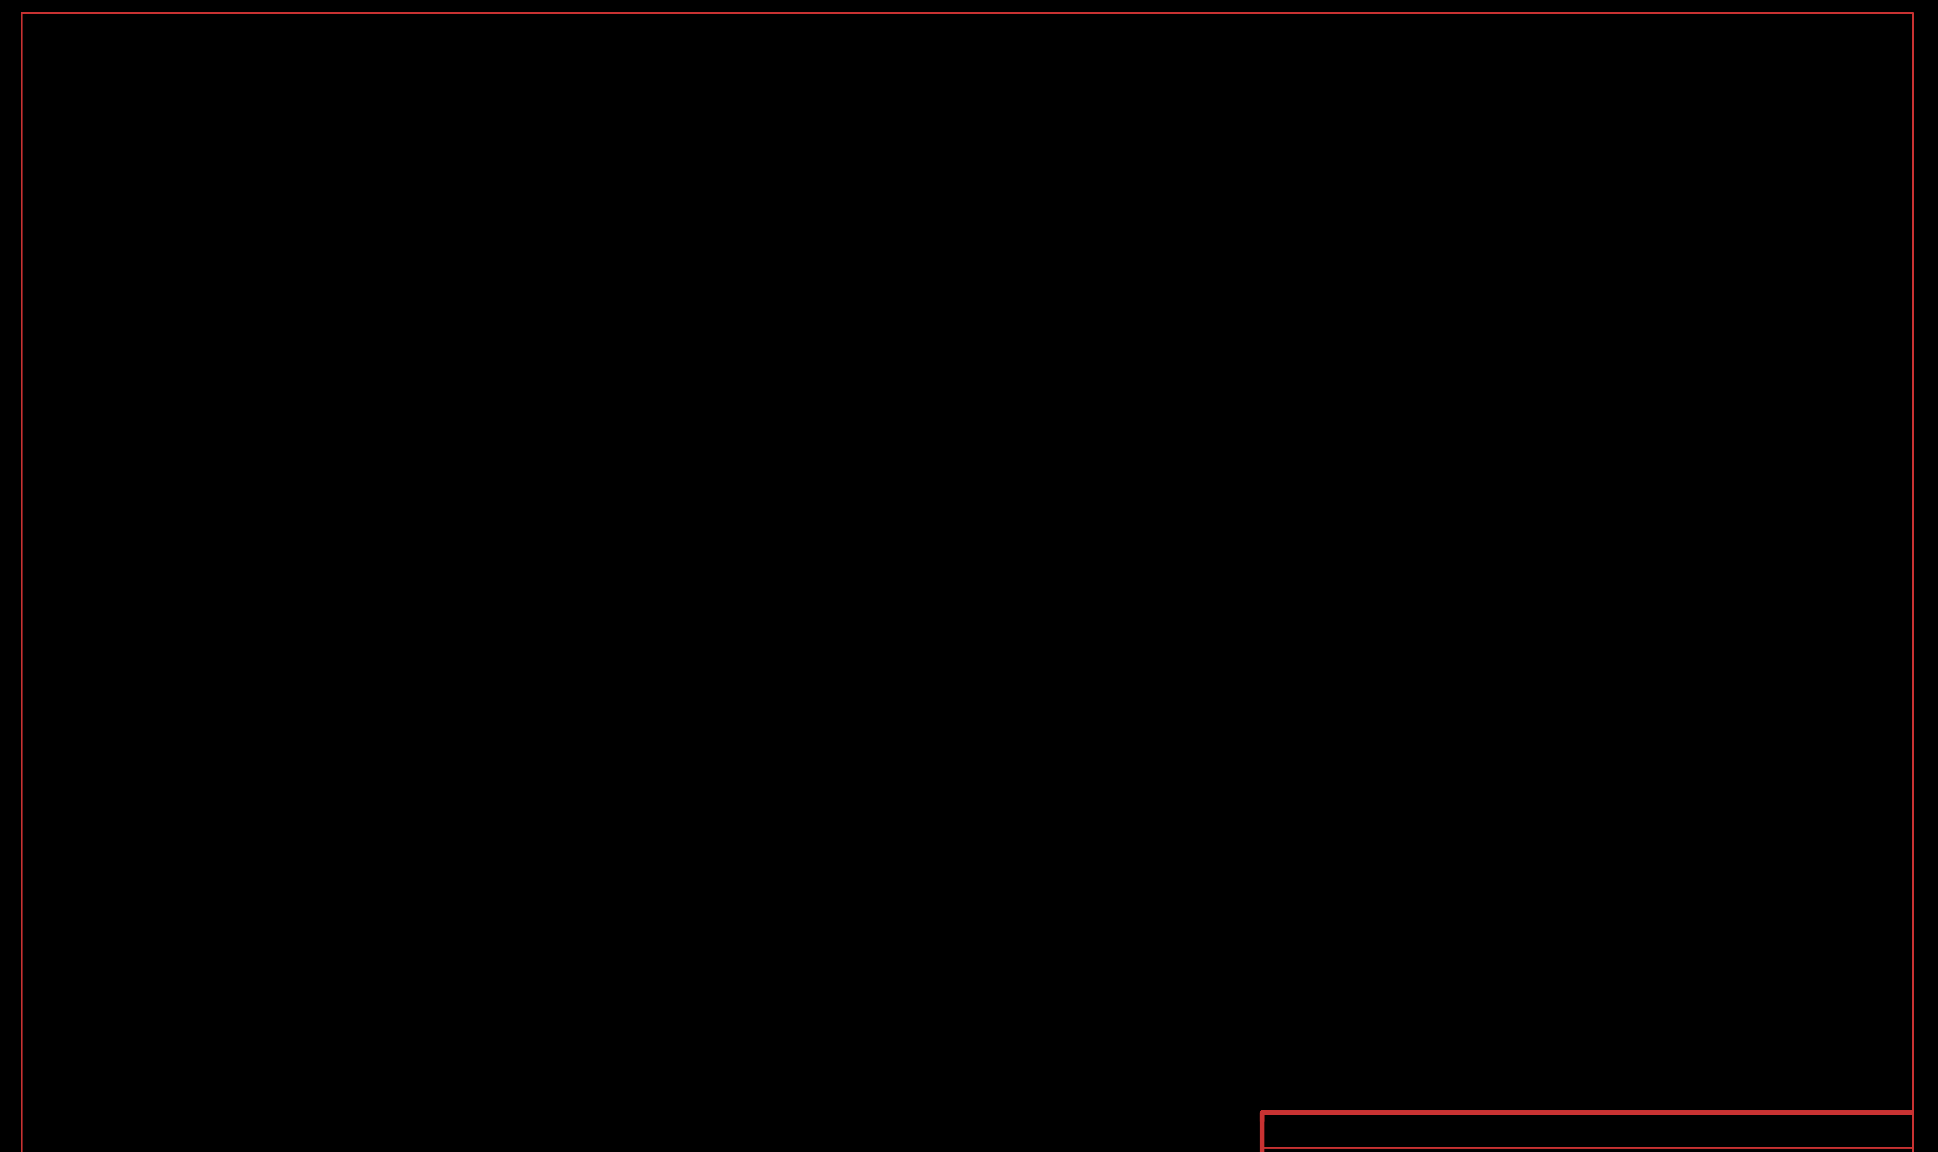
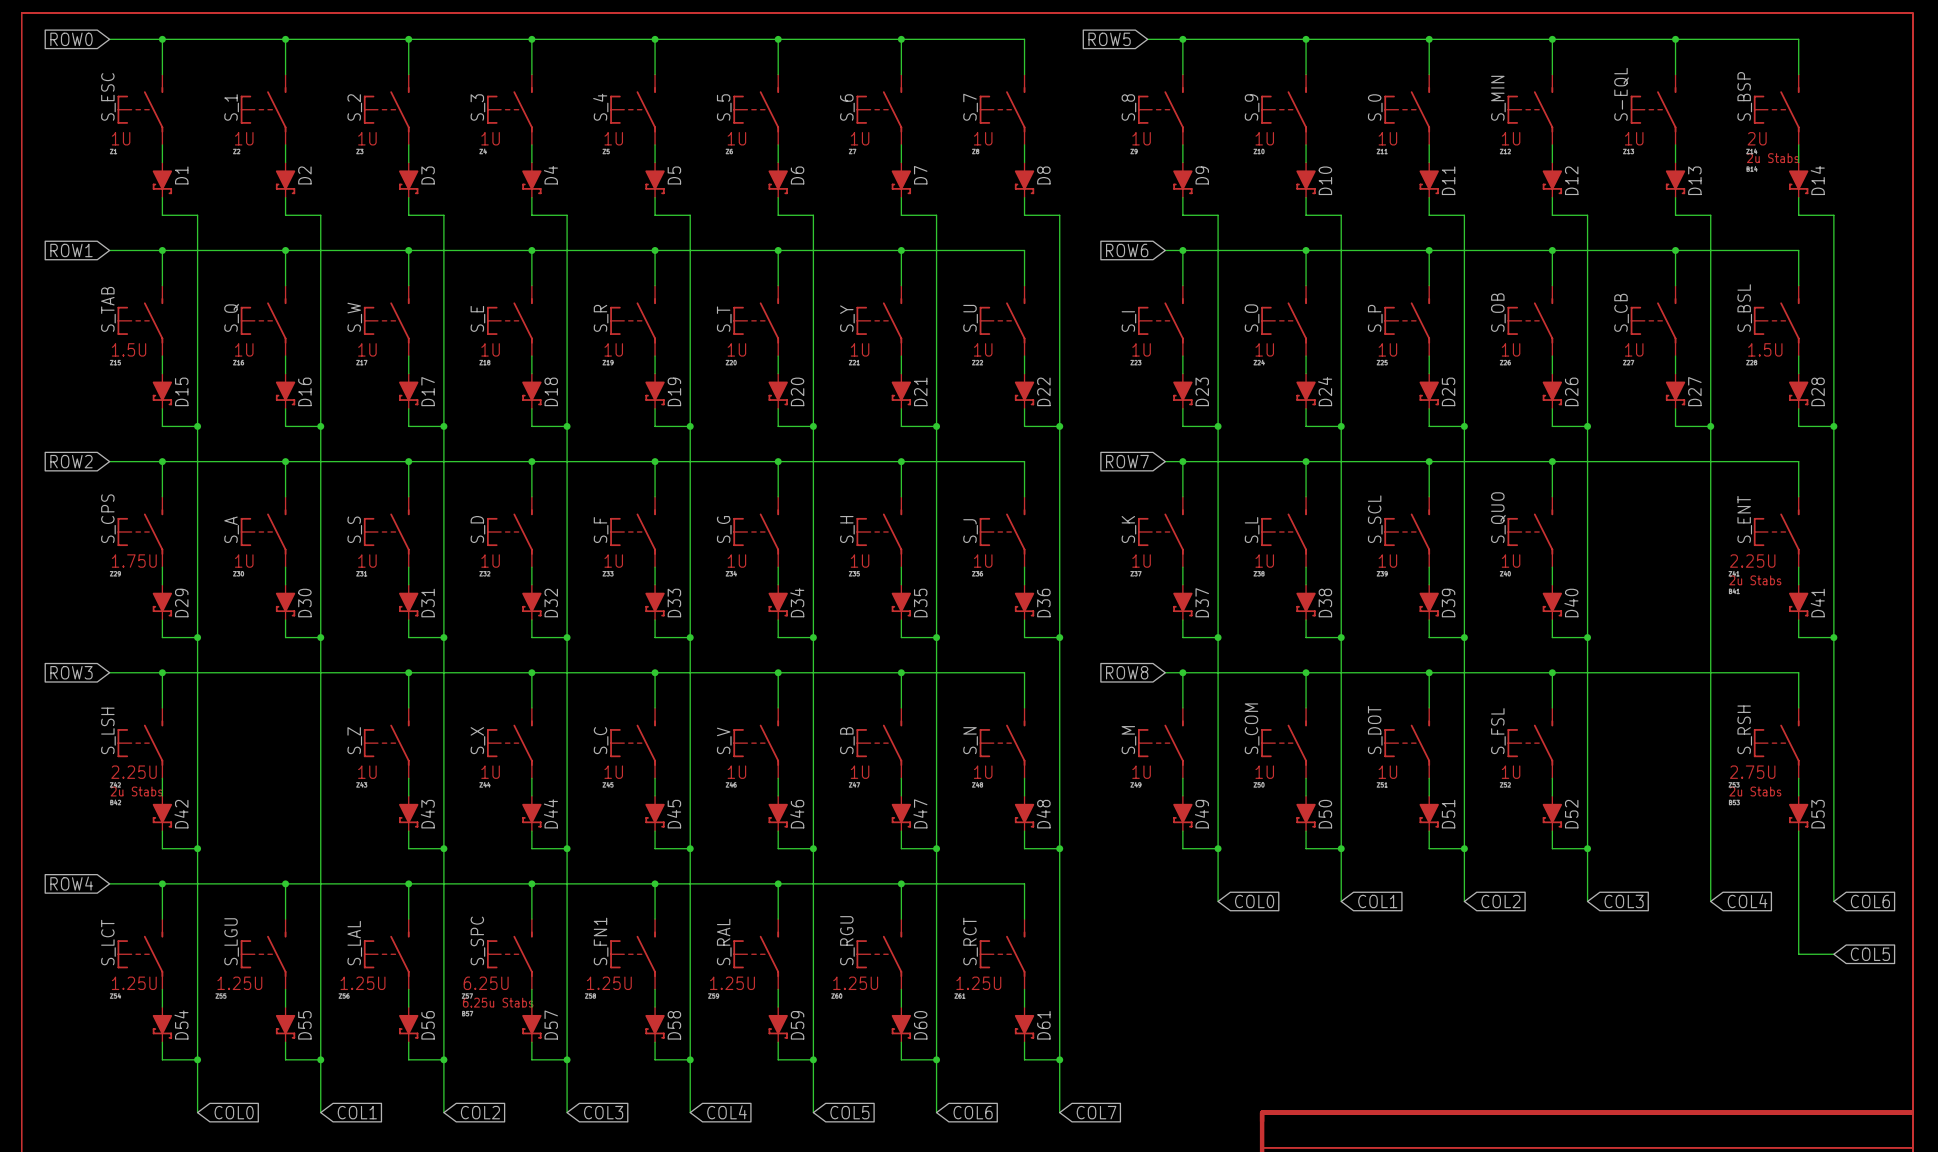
global label: none -> ROW0 (71, 39)
wire: none -> (109, 39) (1024, 39) (1024, 74)
wire: none -> (162, 39) (162, 74)
junction: none -> (162, 39)
wire: none -> (285, 39) (285, 74)
junction: none -> (285, 39)
wire: none -> (408, 39) (408, 74)
junction: none -> (408, 39)
wire: none -> (531, 39) (531, 74)
junction: none -> (531, 39)
wire: none -> (655, 39) (655, 74)
junction: none -> (655, 39)
wire: none -> (778, 39) (778, 74)
junction: none -> (778, 39)
wire: none -> (901, 39) (901, 74)
junction: none -> (901, 39)
global label: none -> ROW5 (1109, 39)
wire: none -> (1147, 39) (1798, 39) (1798, 74)
wire: none -> (1182, 39) (1182, 74)
junction: none -> (1182, 39)
wire: none -> (1306, 39) (1306, 74)
junction: none -> (1306, 39)
wire: none -> (1429, 39) (1429, 74)
junction: none -> (1429, 39)
wire: none -> (1552, 39) (1552, 74)
junction: none -> (1552, 39)
wire: none -> (1675, 39) (1675, 74)
junction: none -> (1675, 39)
S_ESC: none -> (140, 109)
S_1: none -> (263, 109)
S_2: none -> (386, 109)
S_3: none -> (509, 109)
S_4: none -> (633, 109)
S_5: none -> (756, 109)
S_6: none -> (879, 109)
S_7: none -> (1002, 109)
S_8: none -> (1160, 109)
S_9: none -> (1284, 109)
S_0: none -> (1407, 109)
S_MIN: none -> (1530, 109)
S-EQL: none -> (1653, 109)
S_BSP: none -> (1776, 109)
part: none -> (120, 142)
part: none -> (243, 142)
part: none -> (366, 142)
part: none -> (489, 142)
part: none -> (612, 142)
part: none -> (736, 142)
part: none -> (859, 142)
part: none -> (982, 142)
part: none -> (1140, 142)
part: none -> (1263, 142)
part: none -> (1387, 142)
part: none -> (1510, 142)
part: none -> (1633, 142)
part: none -> (1756, 142)
wire: none -> (162, 144) (162, 162)
wire: none -> (285, 144) (285, 162)
wire: none -> (408, 144) (408, 162)
wire: none -> (531, 144) (531, 162)
wire: none -> (655, 144) (655, 162)
wire: none -> (778, 144) (778, 162)
wire: none -> (901, 144) (901, 162)
wire: none -> (1024, 144) (1024, 162)
wire: none -> (1182, 144) (1182, 162)
wire: none -> (1306, 144) (1306, 162)
wire: none -> (1429, 144) (1429, 162)
wire: none -> (1552, 144) (1552, 162)
wire: none -> (1675, 144) (1675, 162)
wire: none -> (1798, 144) (1798, 162)
part: none -> (1772, 162)
D1: none -> (162, 180)
D2: none -> (285, 180)
D3: none -> (408, 180)
D4: none -> (531, 180)
D5: none -> (655, 180)
D6: none -> (778, 180)
D7: none -> (901, 180)
D8: none -> (1024, 180)
D9: none -> (1182, 180)
D10: none -> (1306, 180)
D11: none -> (1429, 180)
D12: none -> (1552, 180)
D13: none -> (1675, 180)
D14: none -> (1798, 180)
wire: none -> (162, 197) (162, 215) (197, 215) (197, 1112)
wire: none -> (285, 197) (285, 215) (320, 215) (320, 1112)
wire: none -> (408, 197) (408, 215) (443, 215) (443, 1112)
wire: none -> (531, 197) (531, 215) (567, 215) (567, 1112)
wire: none -> (655, 197) (655, 215) (690, 215) (690, 1112)
wire: none -> (778, 197) (778, 215) (813, 215) (813, 1112)
wire: none -> (901, 197) (901, 215) (936, 215) (936, 1112)
wire: none -> (1024, 197) (1024, 215) (1059, 215) (1059, 1112)
wire: none -> (1182, 197) (1182, 215) (1218, 215) (1218, 901)
wire: none -> (1306, 197) (1306, 215) (1341, 215) (1341, 901)
wire: none -> (1429, 197) (1429, 215) (1464, 215) (1464, 901)
wire: none -> (1552, 197) (1552, 215) (1587, 215) (1587, 901)
wire: none -> (1675, 197) (1675, 215) (1710, 215) (1710, 901)
wire: none -> (1798, 197) (1798, 215) (1833, 215) (1833, 901)
global label: none -> ROW1 (71, 250)
wire: none -> (109, 250) (1024, 250) (1024, 285)
wire: none -> (162, 250) (162, 285)
junction: none -> (162, 250)
wire: none -> (285, 250) (285, 285)
junction: none -> (285, 250)
wire: none -> (408, 250) (408, 285)
junction: none -> (408, 250)
wire: none -> (531, 250) (531, 285)
junction: none -> (531, 250)
wire: none -> (655, 250) (655, 285)
junction: none -> (655, 250)
wire: none -> (778, 250) (778, 285)
junction: none -> (778, 250)
wire: none -> (901, 250) (901, 285)
junction: none -> (901, 250)
global label: none -> ROW6 (1127, 250)
wire: none -> (1165, 250) (1798, 250) (1798, 285)
wire: none -> (1182, 250) (1182, 285)
junction: none -> (1182, 250)
wire: none -> (1306, 250) (1306, 285)
junction: none -> (1306, 250)
wire: none -> (1429, 250) (1429, 285)
junction: none -> (1429, 250)
wire: none -> (1552, 250) (1552, 285)
junction: none -> (1552, 250)
wire: none -> (1675, 250) (1675, 285)
junction: none -> (1675, 250)
S_TAB: none -> (140, 320)
S_Q: none -> (263, 320)
S_W: none -> (386, 320)
S_E: none -> (509, 320)
S_R: none -> (633, 320)
S_T: none -> (756, 320)
S_Y: none -> (879, 320)
S_U: none -> (1002, 320)
S_I: none -> (1160, 320)
S_O: none -> (1284, 320)
S_P: none -> (1407, 320)
S_OB: none -> (1530, 320)
S_CB: none -> (1653, 320)
S_BSL: none -> (1776, 320)
part: none -> (128, 354)
part: none -> (243, 354)
part: none -> (366, 354)
part: none -> (489, 354)
part: none -> (612, 354)
part: none -> (736, 354)
part: none -> (859, 354)
part: none -> (982, 354)
part: none -> (1140, 354)
part: none -> (1263, 354)
part: none -> (1387, 354)
part: none -> (1510, 354)
part: none -> (1633, 354)
part: none -> (1764, 354)
wire: none -> (162, 356) (162, 373)
wire: none -> (285, 356) (285, 373)
wire: none -> (408, 356) (408, 373)
wire: none -> (531, 356) (531, 373)
wire: none -> (655, 356) (655, 373)
wire: none -> (778, 356) (778, 373)
wire: none -> (901, 356) (901, 373)
wire: none -> (1024, 356) (1024, 373)
wire: none -> (1182, 356) (1182, 373)
wire: none -> (1306, 356) (1306, 373)
wire: none -> (1429, 356) (1429, 373)
wire: none -> (1552, 356) (1552, 373)
wire: none -> (1675, 356) (1675, 373)
wire: none -> (1798, 356) (1798, 373)
D15: none -> (162, 391)
D16: none -> (285, 391)
D17: none -> (408, 391)
D18: none -> (531, 391)
D19: none -> (655, 391)
D20: none -> (778, 391)
D21: none -> (901, 391)
D22: none -> (1024, 391)
D23: none -> (1182, 391)
D24: none -> (1306, 391)
D25: none -> (1429, 391)
D26: none -> (1552, 391)
D27: none -> (1675, 391)
D28: none -> (1798, 391)
wire: none -> (162, 408) (162, 426) (197, 426)
wire: none -> (285, 408) (285, 426) (320, 426)
wire: none -> (408, 408) (408, 426) (443, 426)
wire: none -> (531, 408) (531, 426) (567, 426)
wire: none -> (655, 408) (655, 426) (690, 426)
wire: none -> (778, 408) (778, 426) (813, 426)
wire: none -> (901, 408) (901, 426) (936, 426)
wire: none -> (1024, 408) (1024, 426) (1059, 426)
wire: none -> (1182, 408) (1182, 426) (1218, 426)
wire: none -> (1306, 408) (1306, 426) (1341, 426)
wire: none -> (1429, 408) (1429, 426) (1464, 426)
wire: none -> (1552, 408) (1552, 426) (1587, 426)
wire: none -> (1675, 408) (1675, 426) (1710, 426)
wire: none -> (1798, 408) (1798, 426) (1833, 426)
junction: none -> (197, 426)
junction: none -> (320, 426)
junction: none -> (443, 426)
junction: none -> (567, 426)
junction: none -> (690, 426)
junction: none -> (813, 426)
junction: none -> (936, 426)
junction: none -> (1059, 426)
junction: none -> (1218, 426)
junction: none -> (1341, 426)
junction: none -> (1464, 426)
junction: none -> (1587, 426)
junction: none -> (1710, 426)
junction: none -> (1833, 426)
global label: none -> ROW2 (71, 461)
wire: none -> (109, 461) (1024, 461) (1024, 496)
wire: none -> (162, 461) (162, 496)
junction: none -> (162, 461)
wire: none -> (285, 461) (285, 496)
junction: none -> (285, 461)
wire: none -> (408, 461) (408, 496)
junction: none -> (408, 461)
wire: none -> (531, 461) (531, 496)
junction: none -> (531, 461)
wire: none -> (655, 461) (655, 496)
junction: none -> (655, 461)
wire: none -> (778, 461) (778, 496)
junction: none -> (778, 461)
wire: none -> (901, 461) (901, 496)
junction: none -> (901, 461)
global label: none -> ROW7 (1127, 461)
wire: none -> (1165, 461) (1798, 461) (1798, 496)
wire: none -> (1182, 461) (1182, 496)
junction: none -> (1182, 461)
wire: none -> (1306, 461) (1306, 496)
junction: none -> (1306, 461)
wire: none -> (1429, 461) (1429, 496)
junction: none -> (1429, 461)
wire: none -> (1552, 461) (1552, 496)
junction: none -> (1552, 461)
S_CPS: none -> (140, 531)
S_A: none -> (263, 531)
S_S: none -> (386, 531)
S_D: none -> (509, 531)
S_F: none -> (633, 531)
S_G: none -> (756, 531)
S_H: none -> (879, 531)
S_J: none -> (1002, 531)
S_K: none -> (1160, 531)
S_L: none -> (1284, 531)
S_SCL: none -> (1407, 531)
S_QUO: none -> (1530, 531)
S_ENT: none -> (1776, 531)
part: none -> (133, 565)
part: none -> (243, 565)
part: none -> (366, 565)
part: none -> (489, 565)
part: none -> (612, 565)
part: none -> (736, 565)
part: none -> (859, 565)
part: none -> (982, 565)
part: none -> (1140, 565)
part: none -> (1263, 565)
part: none -> (1387, 565)
part: none -> (1510, 565)
part: none -> (1752, 565)
wire: none -> (162, 567) (162, 584)
wire: none -> (285, 567) (285, 584)
wire: none -> (408, 567) (408, 584)
wire: none -> (531, 567) (531, 584)
wire: none -> (655, 567) (655, 584)
wire: none -> (778, 567) (778, 584)
wire: none -> (901, 567) (901, 584)
wire: none -> (1024, 567) (1024, 584)
wire: none -> (1182, 567) (1182, 584)
wire: none -> (1306, 567) (1306, 584)
wire: none -> (1429, 567) (1429, 584)
wire: none -> (1552, 567) (1552, 584)
wire: none -> (1798, 567) (1798, 584)
part: none -> (1755, 584)
D29: none -> (162, 602)
D30: none -> (285, 602)
D31: none -> (408, 602)
D32: none -> (531, 602)
D33: none -> (655, 602)
D34: none -> (778, 602)
D35: none -> (901, 602)
D36: none -> (1024, 602)
D37: none -> (1182, 602)
D38: none -> (1306, 602)
D39: none -> (1429, 602)
D40: none -> (1552, 602)
D41: none -> (1798, 602)
wire: none -> (162, 619) (162, 637) (197, 637)
wire: none -> (285, 619) (285, 637) (320, 637)
wire: none -> (408, 619) (408, 637) (443, 637)
wire: none -> (531, 619) (531, 637) (567, 637)
wire: none -> (655, 619) (655, 637) (690, 637)
wire: none -> (778, 619) (778, 637) (813, 637)
wire: none -> (901, 619) (901, 637) (936, 637)
wire: none -> (1024, 619) (1024, 637) (1059, 637)
wire: none -> (1182, 619) (1182, 637) (1218, 637)
wire: none -> (1306, 619) (1306, 637) (1341, 637)
wire: none -> (1429, 619) (1429, 637) (1464, 637)
wire: none -> (1552, 619) (1552, 637) (1587, 637)
wire: none -> (1798, 619) (1798, 637) (1833, 637)
junction: none -> (197, 637)
junction: none -> (320, 637)
junction: none -> (443, 637)
junction: none -> (567, 637)
junction: none -> (690, 637)
junction: none -> (813, 637)
junction: none -> (936, 637)
junction: none -> (1059, 637)
junction: none -> (1218, 637)
junction: none -> (1341, 637)
junction: none -> (1464, 637)
junction: none -> (1587, 637)
junction: none -> (1833, 637)
global label: none -> ROW3 (71, 672)
wire: none -> (109, 672) (1024, 672) (1024, 707)
wire: none -> (162, 672) (162, 707)
junction: none -> (162, 672)
wire: none -> (408, 672) (408, 707)
junction: none -> (408, 672)
wire: none -> (531, 672) (531, 707)
junction: none -> (531, 672)
wire: none -> (655, 672) (655, 707)
junction: none -> (655, 672)
wire: none -> (778, 672) (778, 707)
junction: none -> (778, 672)
wire: none -> (901, 672) (901, 707)
junction: none -> (901, 672)
global label: none -> ROW8 (1127, 672)
wire: none -> (1165, 672) (1798, 672) (1798, 707)
wire: none -> (1182, 672) (1182, 707)
junction: none -> (1182, 672)
wire: none -> (1306, 672) (1306, 707)
junction: none -> (1306, 672)
wire: none -> (1429, 672) (1429, 707)
junction: none -> (1429, 672)
wire: none -> (1552, 672) (1552, 707)
junction: none -> (1552, 672)
S_LSH: none -> (140, 743)
S_Z: none -> (386, 743)
S_X: none -> (509, 743)
S_C: none -> (633, 743)
S_V: none -> (756, 743)
S_B: none -> (879, 743)
S_N: none -> (1002, 743)
S_M: none -> (1160, 743)
S_COM: none -> (1284, 743)
S_DOT: none -> (1407, 743)
S_FSL: none -> (1530, 743)
S_RSH: none -> (1776, 743)
part: none -> (133, 776)
part: none -> (366, 776)
part: none -> (489, 776)
part: none -> (612, 776)
part: none -> (736, 776)
part: none -> (859, 776)
part: none -> (982, 776)
part: none -> (1140, 776)
part: none -> (1263, 776)
part: none -> (1387, 776)
part: none -> (1510, 776)
part: none -> (1752, 776)
wire: none -> (162, 778) (162, 795)
wire: none -> (408, 778) (408, 795)
wire: none -> (531, 778) (531, 795)
wire: none -> (655, 778) (655, 795)
wire: none -> (778, 778) (778, 795)
wire: none -> (901, 778) (901, 795)
wire: none -> (1024, 778) (1024, 795)
wire: none -> (1182, 778) (1182, 795)
wire: none -> (1306, 778) (1306, 795)
wire: none -> (1429, 778) (1429, 795)
wire: none -> (1552, 778) (1552, 795)
wire: none -> (1798, 778) (1798, 795)
part: none -> (136, 795)
part: none -> (1755, 795)
D42: none -> (162, 813)
D43: none -> (408, 813)
D44: none -> (531, 813)
D45: none -> (655, 813)
D46: none -> (778, 813)
D47: none -> (901, 813)
D48: none -> (1024, 813)
D49: none -> (1182, 813)
D50: none -> (1306, 813)
D51: none -> (1429, 813)
D52: none -> (1552, 813)
D53: none -> (1798, 813)
wire: none -> (162, 831) (162, 848) (197, 848)
wire: none -> (408, 831) (408, 848) (443, 848)
wire: none -> (531, 831) (531, 848) (567, 848)
wire: none -> (655, 831) (655, 848) (690, 848)
wire: none -> (778, 831) (778, 848) (813, 848)
wire: none -> (901, 831) (901, 848) (936, 848)
wire: none -> (1024, 831) (1024, 848) (1059, 848)
wire: none -> (1182, 831) (1182, 848) (1218, 848)
wire: none -> (1306, 831) (1306, 848) (1341, 848)
wire: none -> (1429, 831) (1429, 848) (1464, 848)
wire: none -> (1552, 831) (1552, 848) (1587, 848)
wire: none -> (1798, 831) (1798, 954) (1833, 954)
junction: none -> (197, 848)
junction: none -> (443, 848)
junction: none -> (567, 848)
junction: none -> (690, 848)
junction: none -> (813, 848)
junction: none -> (936, 848)
junction: none -> (1059, 848)
junction: none -> (1218, 848)
junction: none -> (1341, 848)
junction: none -> (1464, 848)
junction: none -> (1587, 848)
global label: none -> ROW4 (71, 883)
wire: none -> (109, 883) (1024, 883) (1024, 919)
wire: none -> (162, 883) (162, 919)
junction: none -> (162, 883)
wire: none -> (285, 883) (285, 919)
junction: none -> (285, 883)
wire: none -> (408, 883) (408, 919)
junction: none -> (408, 883)
wire: none -> (531, 883) (531, 919)
junction: none -> (531, 883)
wire: none -> (655, 883) (655, 919)
junction: none -> (655, 883)
wire: none -> (778, 883) (778, 919)
junction: none -> (778, 883)
wire: none -> (901, 883) (901, 919)
junction: none -> (901, 883)
global label: none -> COL0 (1254, 901)
global label: none -> COL1 (1377, 901)
global label: none -> COL2 (1500, 901)
global label: none -> COL3 (1624, 901)
global label: none -> COL4 (1747, 901)
global label: none -> COL6 (1870, 901)
S_LCT: none -> (140, 954)
S_LGU: none -> (263, 954)
S_LAL: none -> (386, 954)
S_SPC: none -> (509, 954)
S_FN1: none -> (633, 954)
S_RAL: none -> (756, 954)
S_RGU: none -> (879, 954)
S_RCT: none -> (1002, 954)
global label: none -> COL5 (1870, 954)
part: none -> (133, 987)
part: none -> (239, 987)
part: none -> (362, 987)
part: none -> (485, 987)
part: none -> (608, 987)
part: none -> (731, 987)
part: none -> (854, 987)
part: none -> (977, 987)
wire: none -> (162, 989) (162, 1007)
wire: none -> (285, 989) (285, 1007)
wire: none -> (408, 989) (408, 1007)
wire: none -> (531, 989) (531, 1007)
wire: none -> (655, 989) (655, 1007)
wire: none -> (778, 989) (778, 1007)
wire: none -> (901, 989) (901, 1007)
wire: none -> (1024, 989) (1024, 1007)
part: none -> (497, 1006)
D54: none -> (162, 1024)
D55: none -> (285, 1024)
D56: none -> (408, 1024)
D57: none -> (531, 1024)
D58: none -> (655, 1024)
D59: none -> (778, 1024)
D60: none -> (901, 1024)
D61: none -> (1024, 1024)
wire: none -> (162, 1042) (162, 1059) (197, 1059)
wire: none -> (285, 1042) (285, 1059) (320, 1059)
wire: none -> (408, 1042) (408, 1059) (443, 1059)
wire: none -> (531, 1042) (531, 1059) (567, 1059)
wire: none -> (655, 1042) (655, 1059) (690, 1059)
wire: none -> (778, 1042) (778, 1059) (813, 1059)
wire: none -> (901, 1042) (901, 1059) (936, 1059)
wire: none -> (1024, 1042) (1024, 1059) (1059, 1059)
junction: none -> (197, 1059)
junction: none -> (320, 1059)
junction: none -> (443, 1059)
junction: none -> (567, 1059)
junction: none -> (690, 1059)
junction: none -> (813, 1059)
junction: none -> (936, 1059)
junction: none -> (1059, 1059)
global label: none -> COL0 (234, 1112)
global label: none -> COL1 (357, 1112)
global label: none -> COL2 (480, 1112)
global label: none -> COL3 (603, 1112)
global label: none -> COL4 (727, 1112)
global label: none -> COL5 (849, 1112)
global label: none -> COL6 (973, 1112)
global label: none -> COL7 (1096, 1112)

